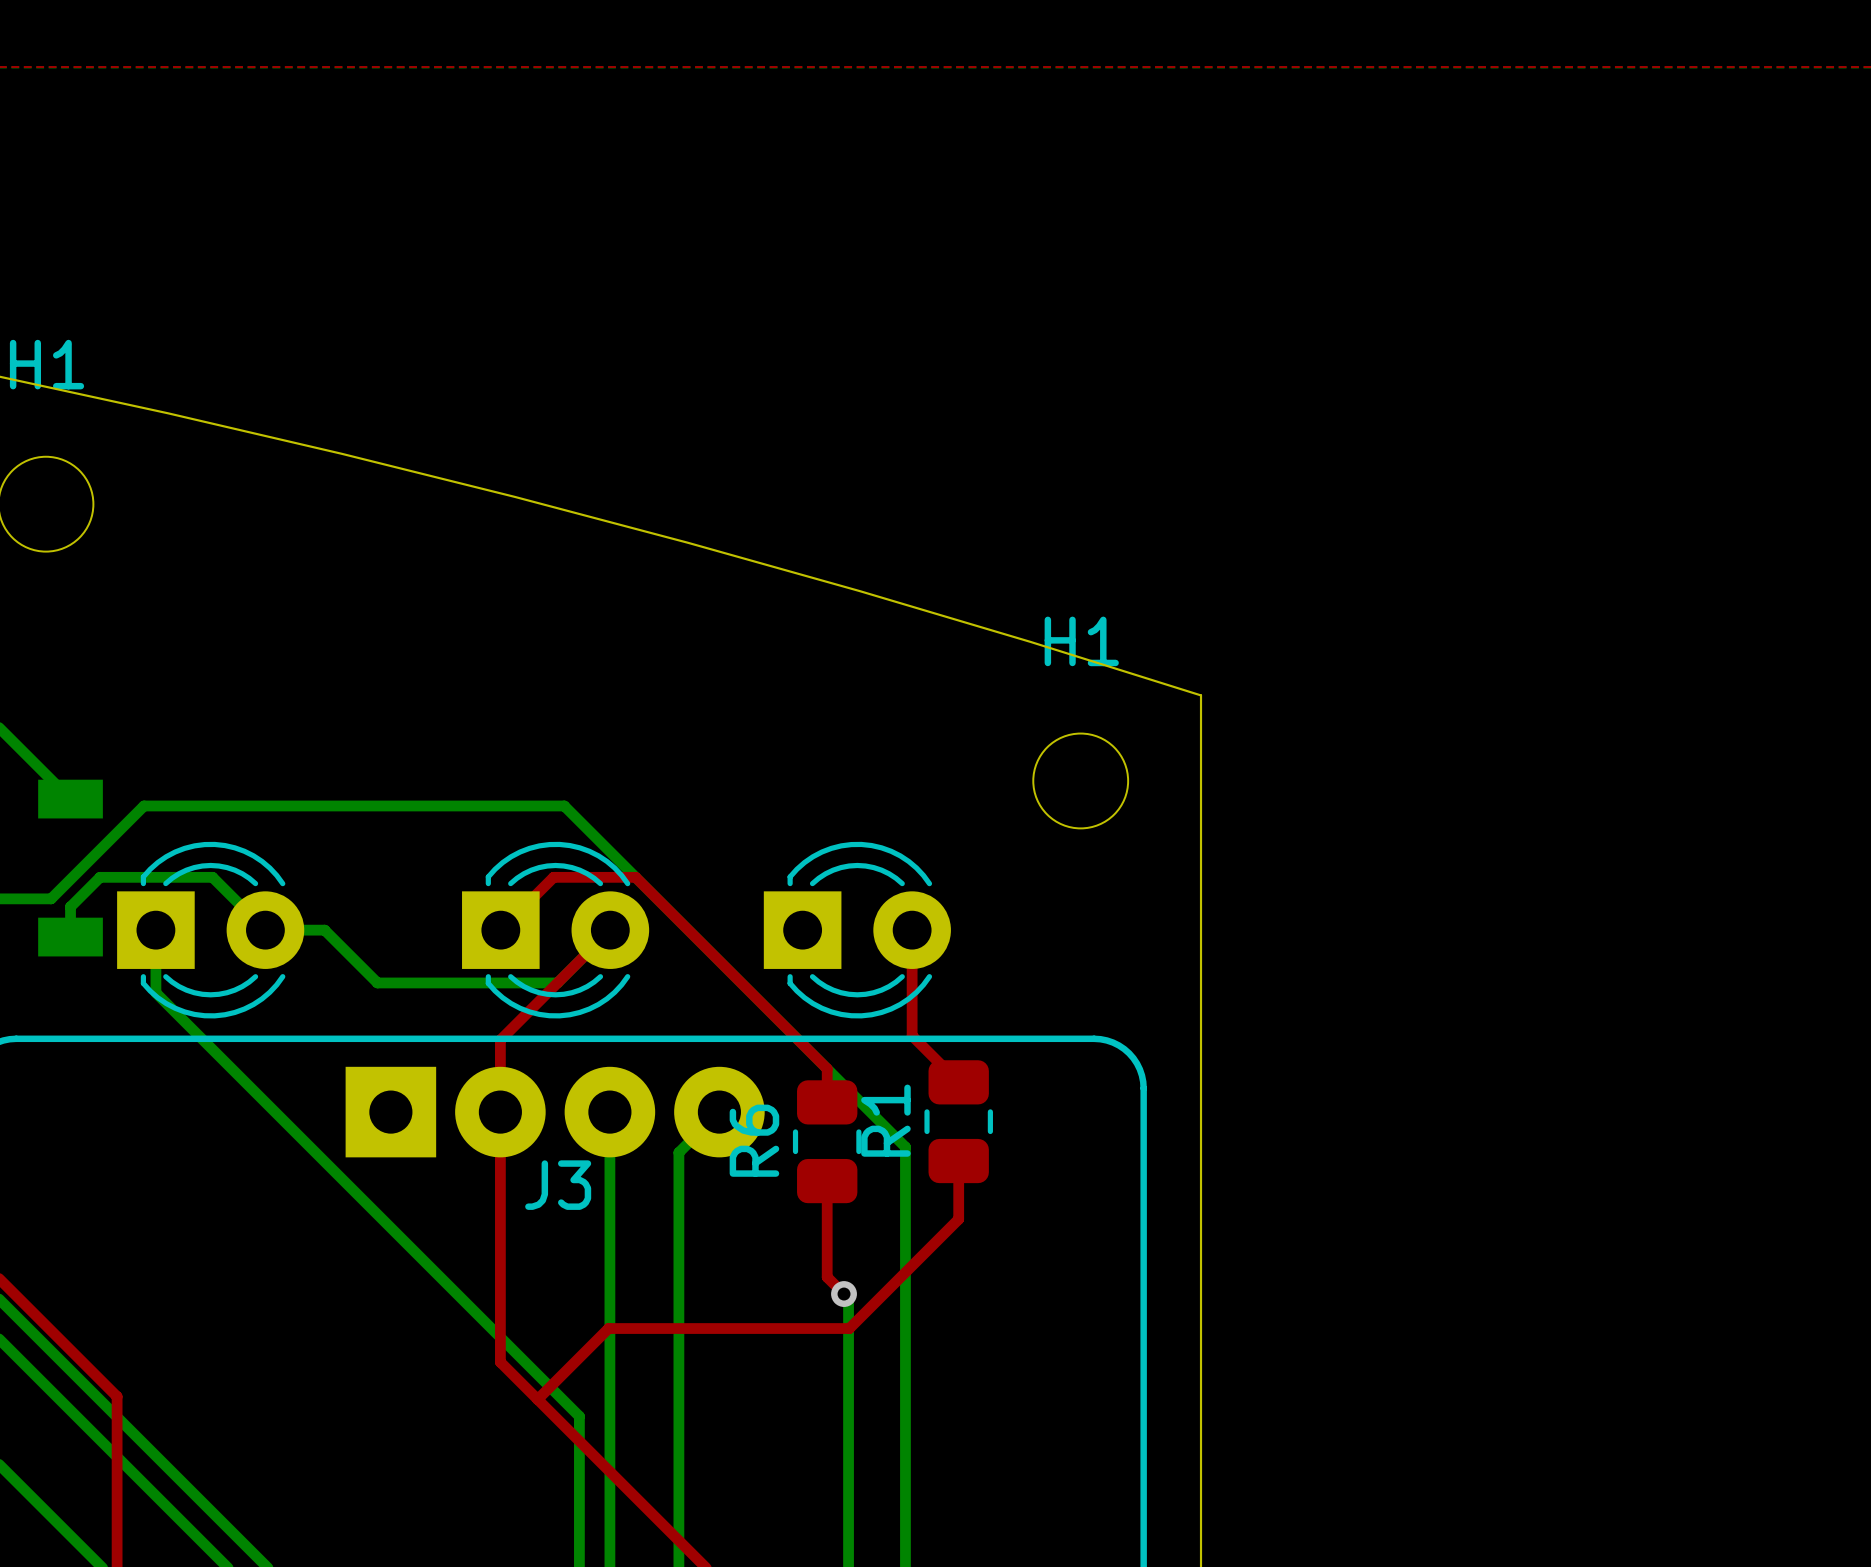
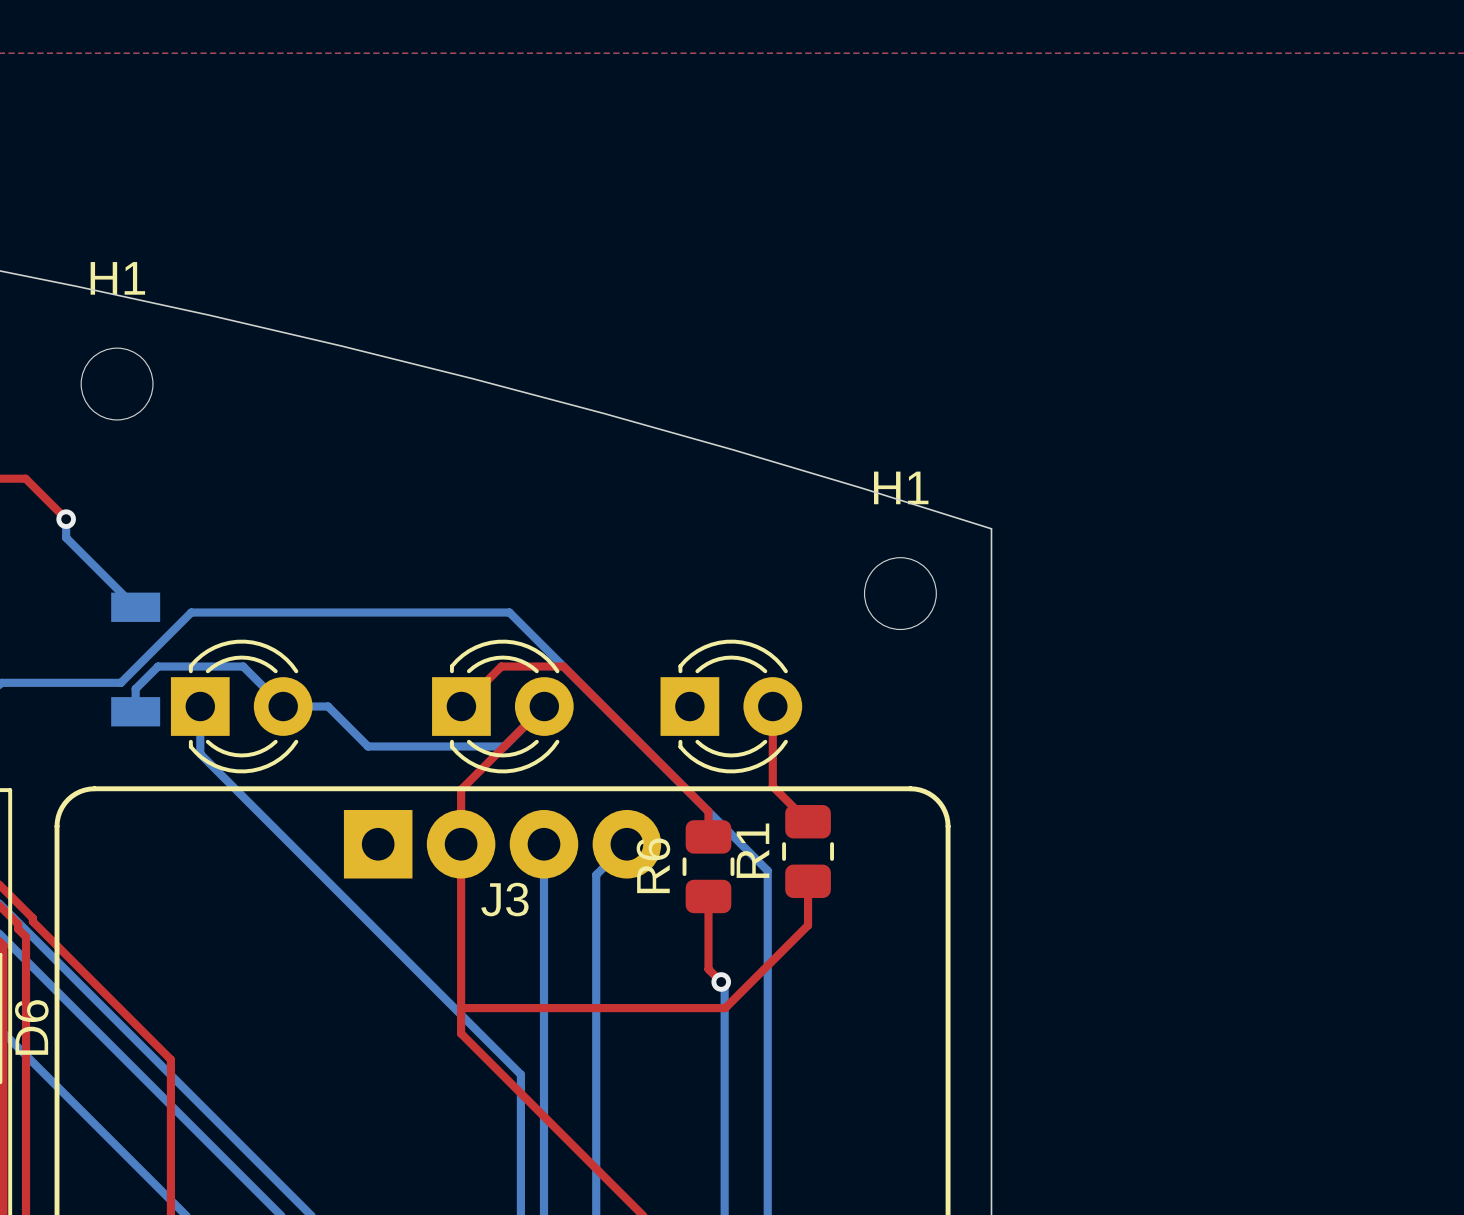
top track: (608, 1328) (537, 1399) -> (543, 1008) (461, 1008)

